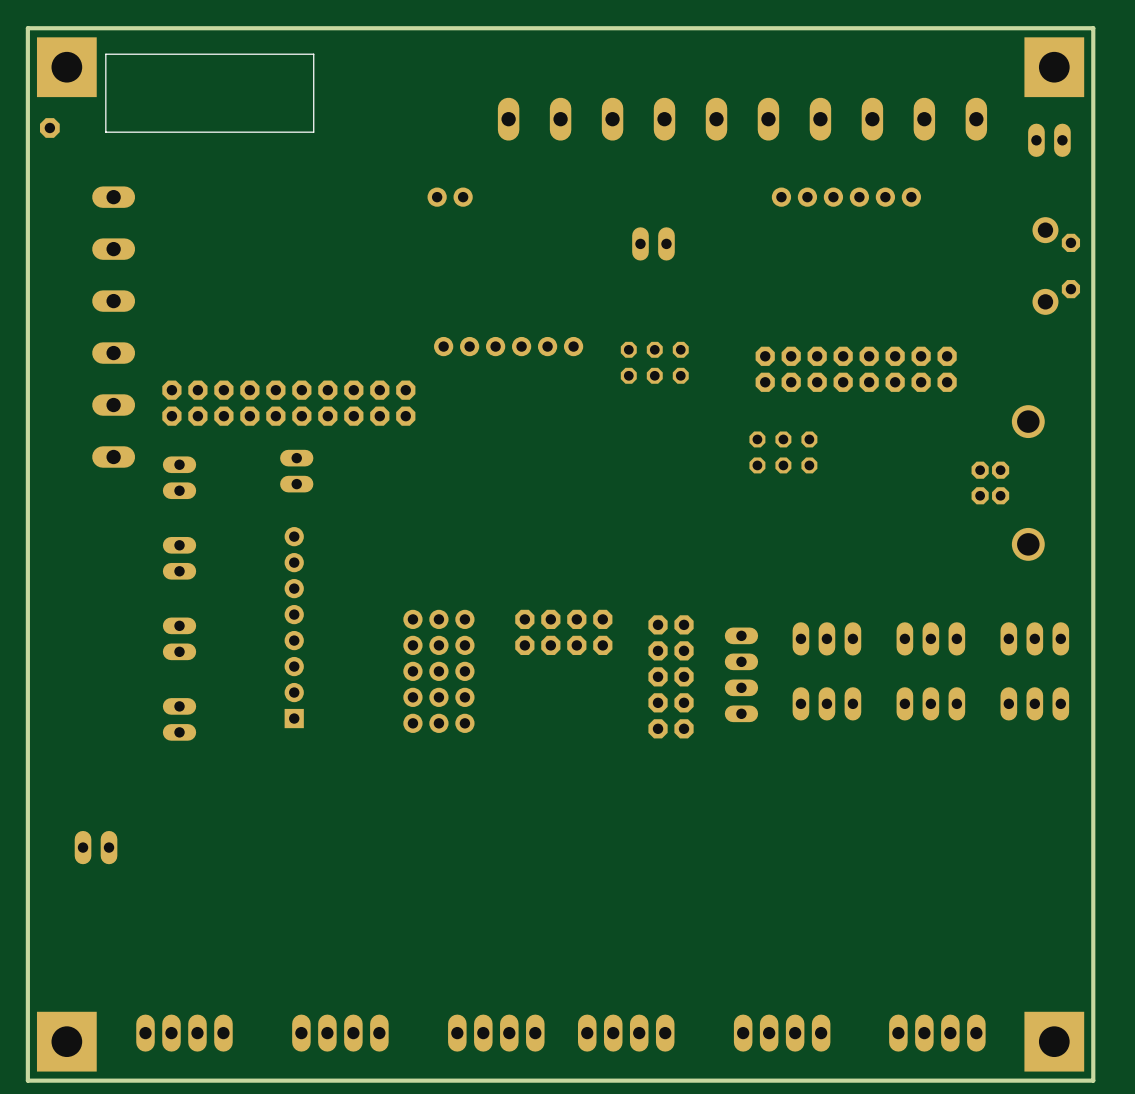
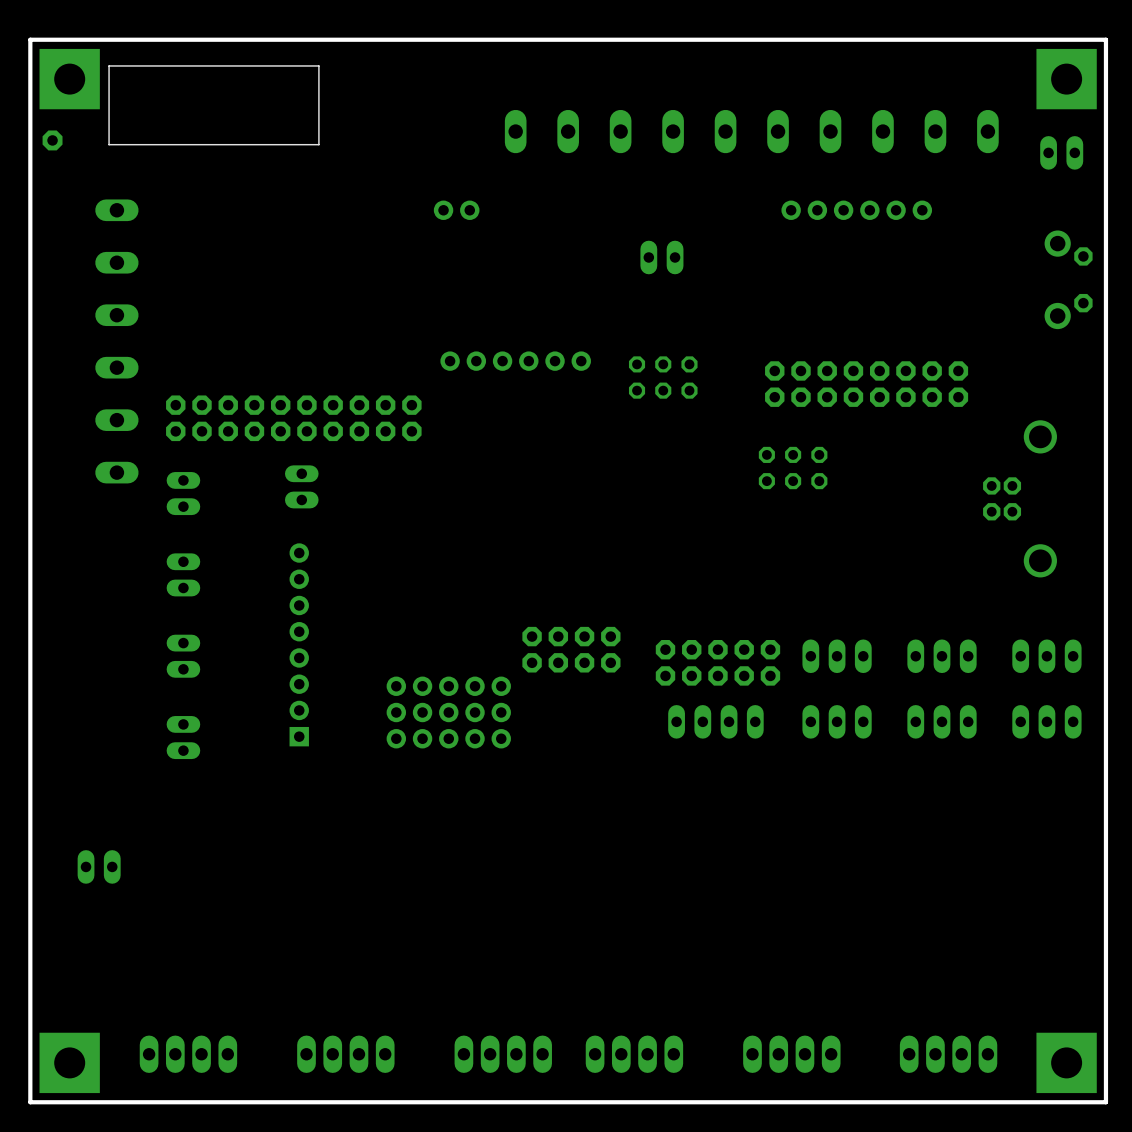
part: (412, 671) -> none
part rotation: 0° (438, 671) -> 90° clockwise (448, 686)
part: (464, 671) -> none
part rotation: 0° (741, 674) -> 90° clockwise (715, 721)
part rotation: 0° (671, 676) -> 90° clockwise (717, 662)
part: none -> (448, 712)
part: none -> (448, 738)

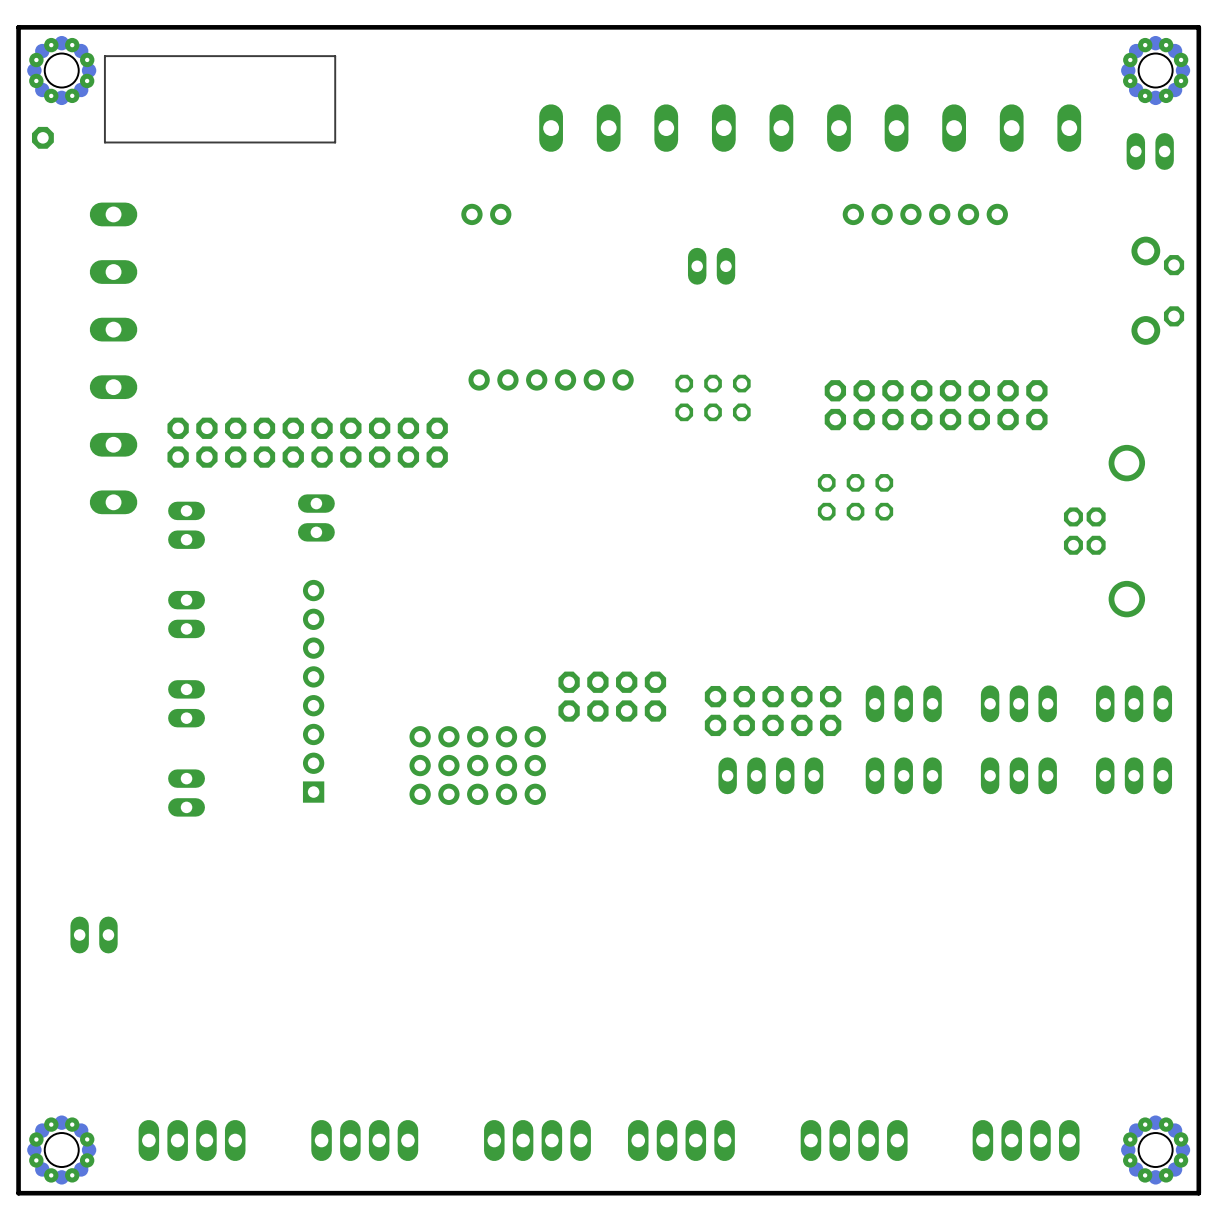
part footprint: [39, 48, 100, 110] -> [27, 35, 97, 106]
part footprint: [1036, 48, 1097, 110] -> [1121, 35, 1191, 106]
part footprint: [39, 1032, 100, 1094] -> [27, 1115, 97, 1185]
part footprint: [1036, 1032, 1097, 1094] -> [1121, 1115, 1191, 1185]

